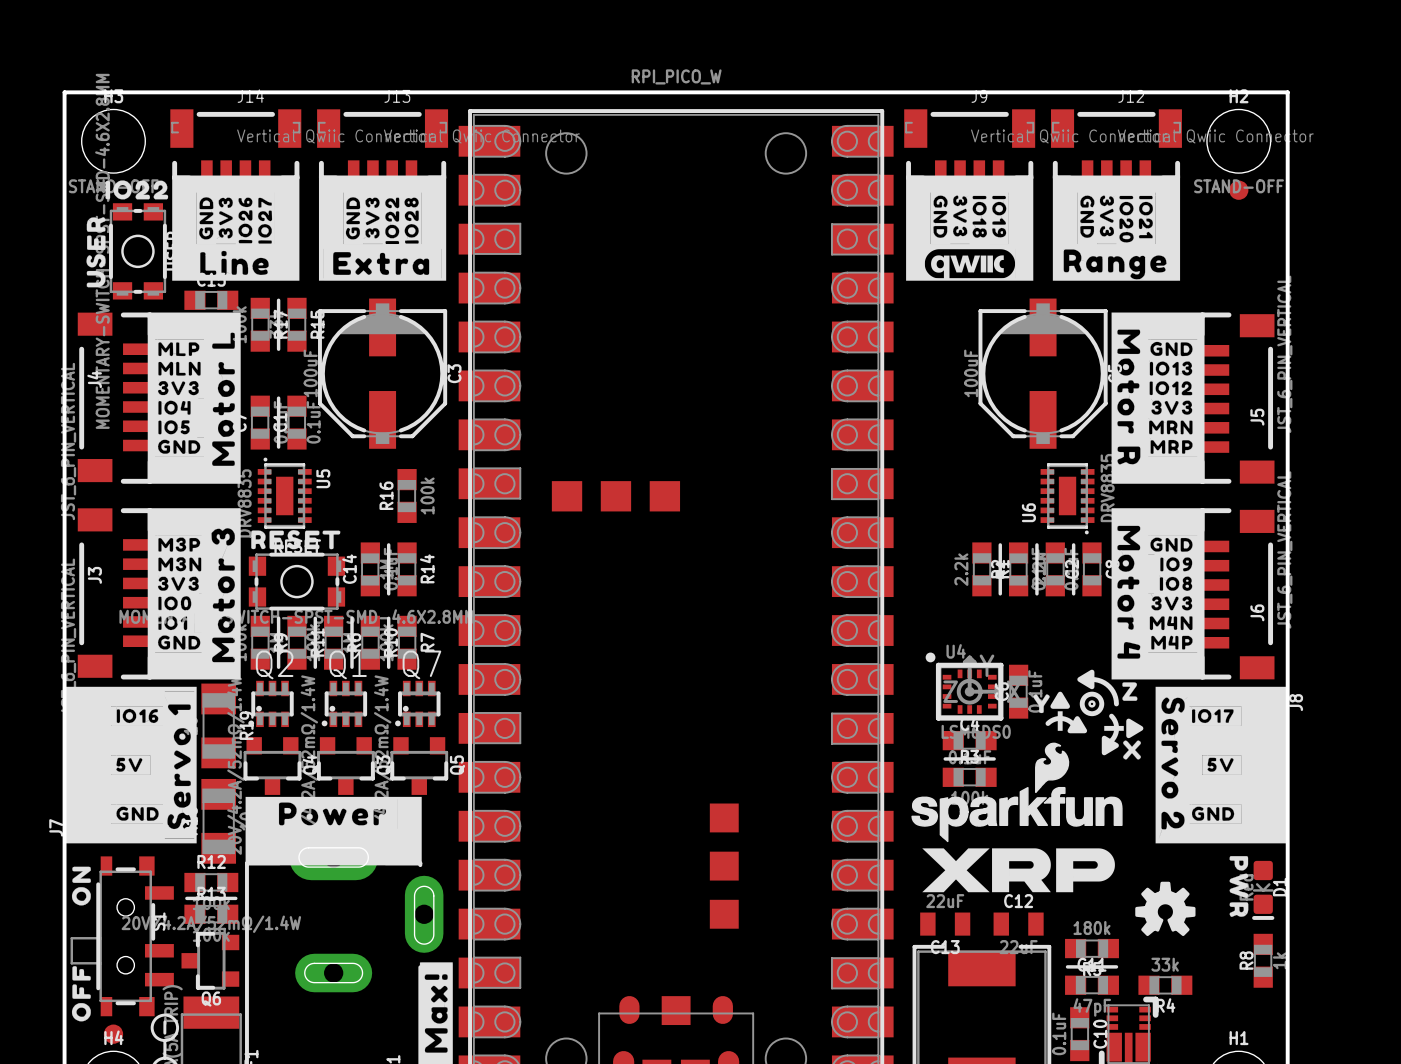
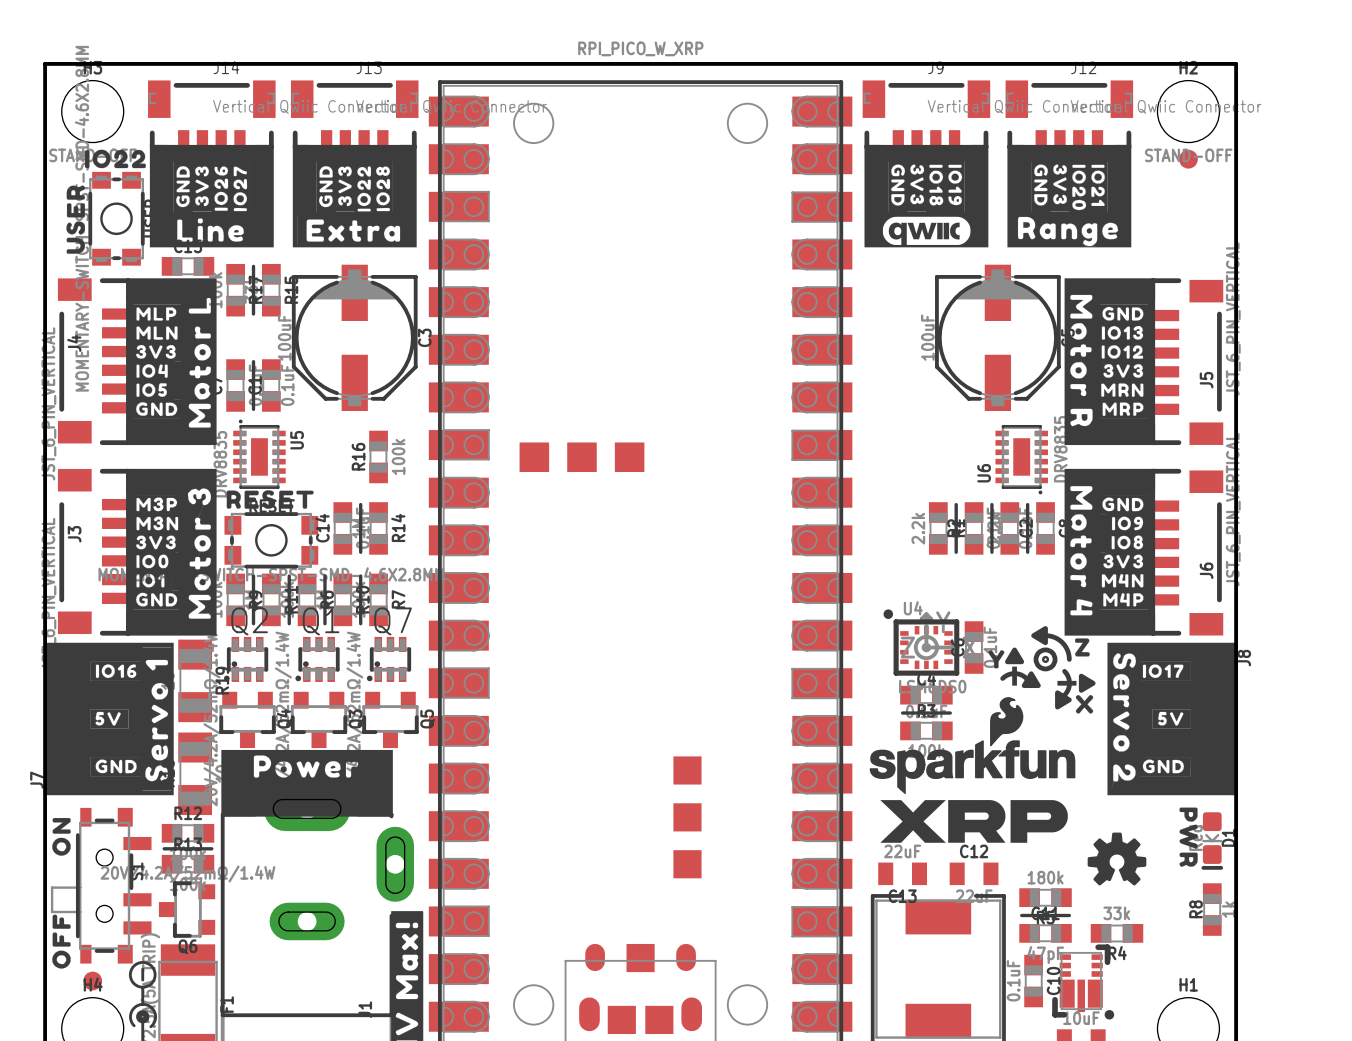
part value: RPI_PICO_W (676, 76) -> RPI_PICO_W_XRP (640, 48)

